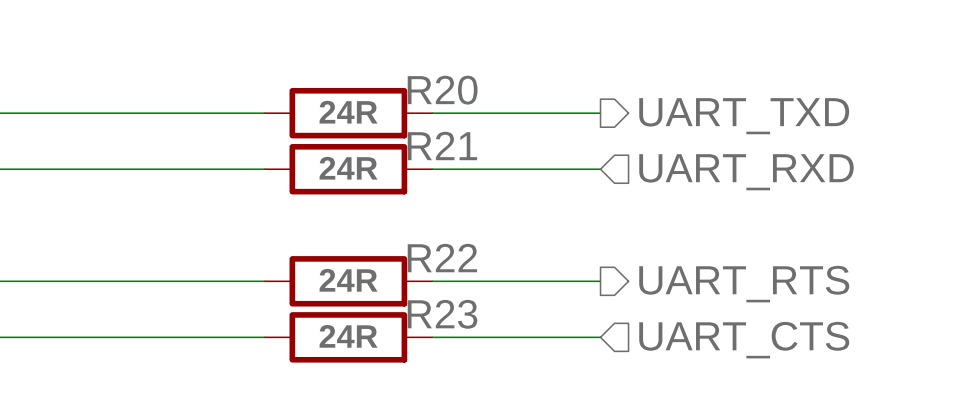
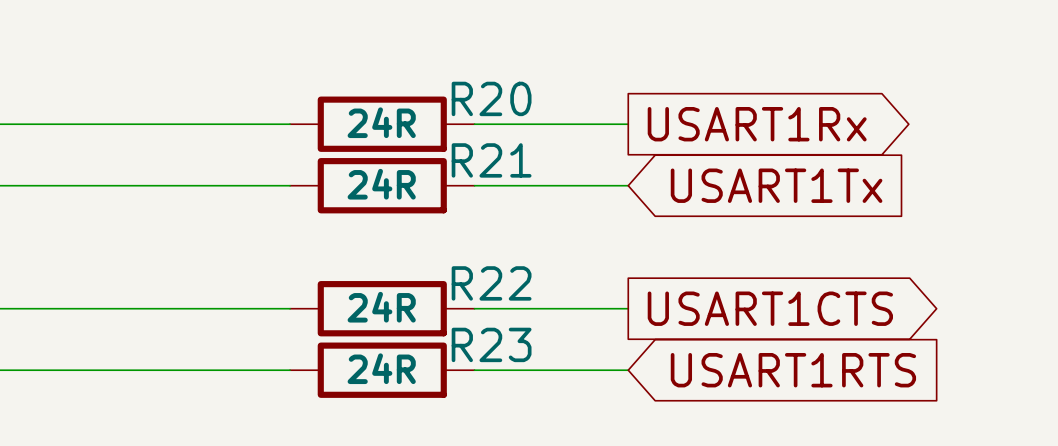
wire: (572, 113) (600, 113) -> none
global label: none -> USART1Rx (757, 124)
hierarchical label: UART_TXD (744, 116) -> none
wire: (572, 169) (600, 169) -> none
global label: none -> USART1Tx (776, 185)
hierarchical label: UART_RXD (746, 172) -> none
wire: (572, 281) (600, 281) -> none
global label: none -> USART1CTS (770, 308)
hierarchical label: UART_RTS (744, 284) -> none
wire: (572, 337) (600, 337) -> none
global label: none -> USART1RTS (793, 370)
hierarchical label: UART_CTS (744, 340) -> none

